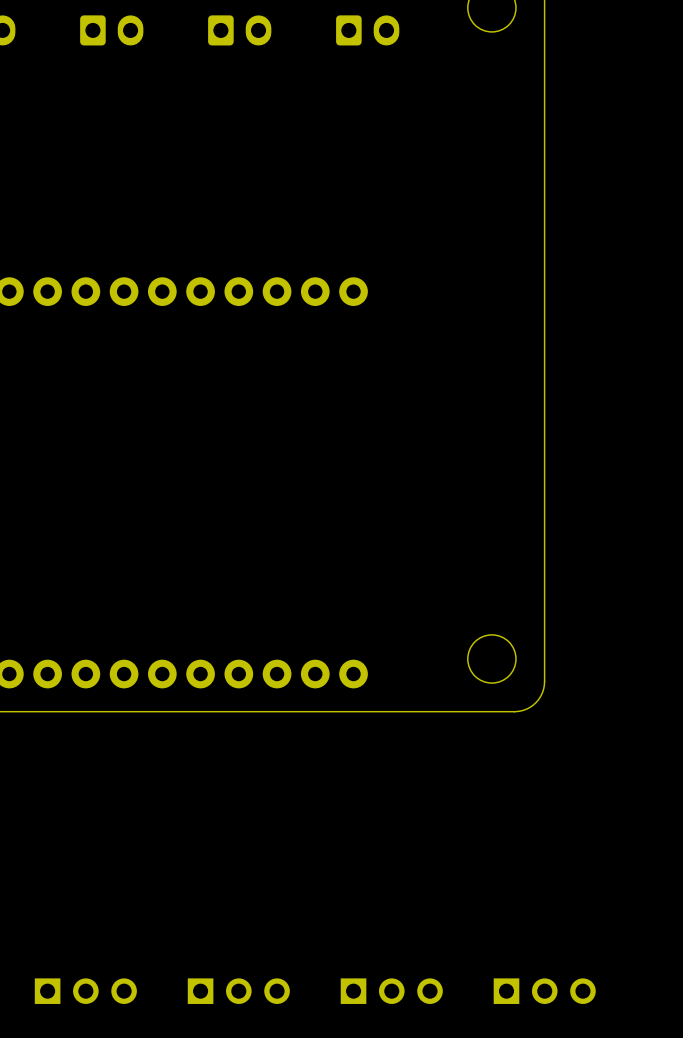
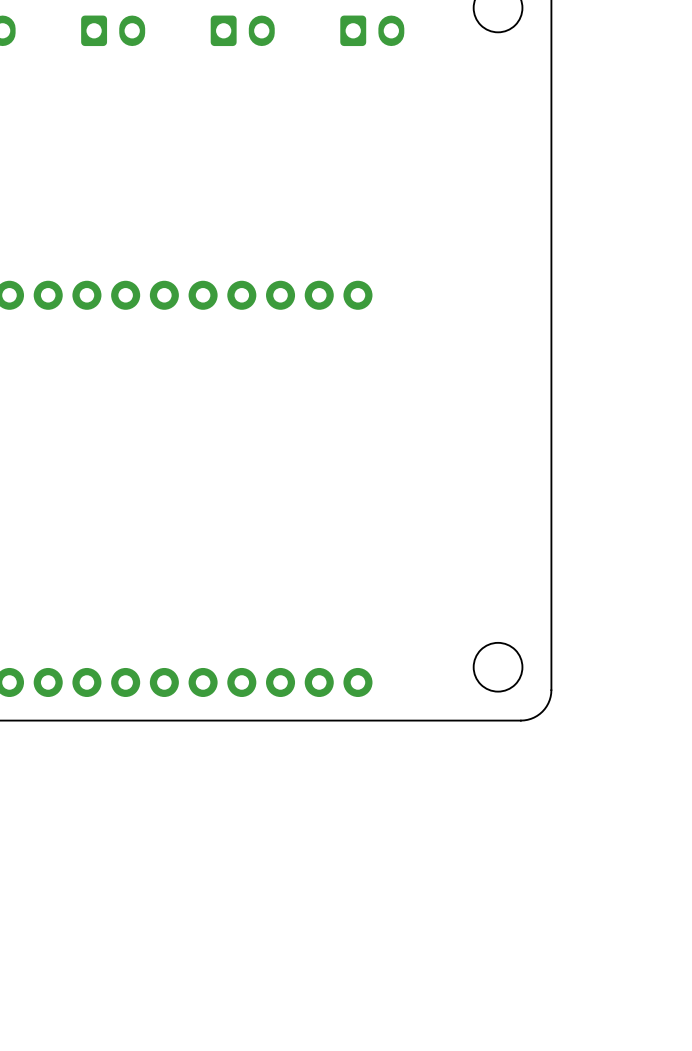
part: (85, 991) -> none
part: (238, 991) -> none
part: (391, 991) -> none
part: (544, 991) -> none

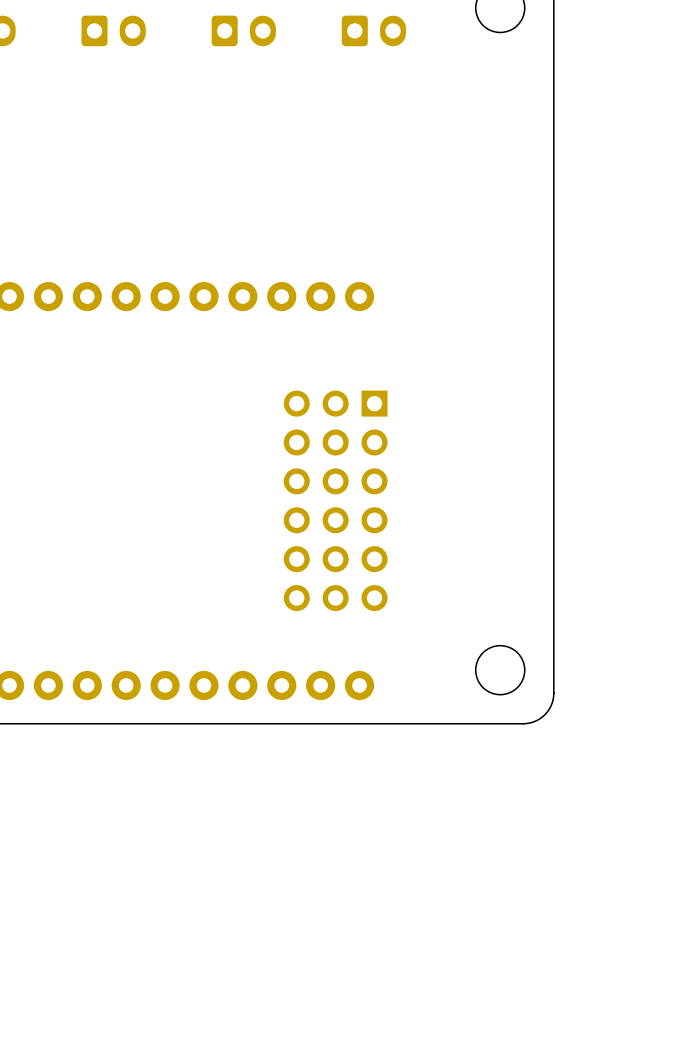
part: none -> (335, 500)

